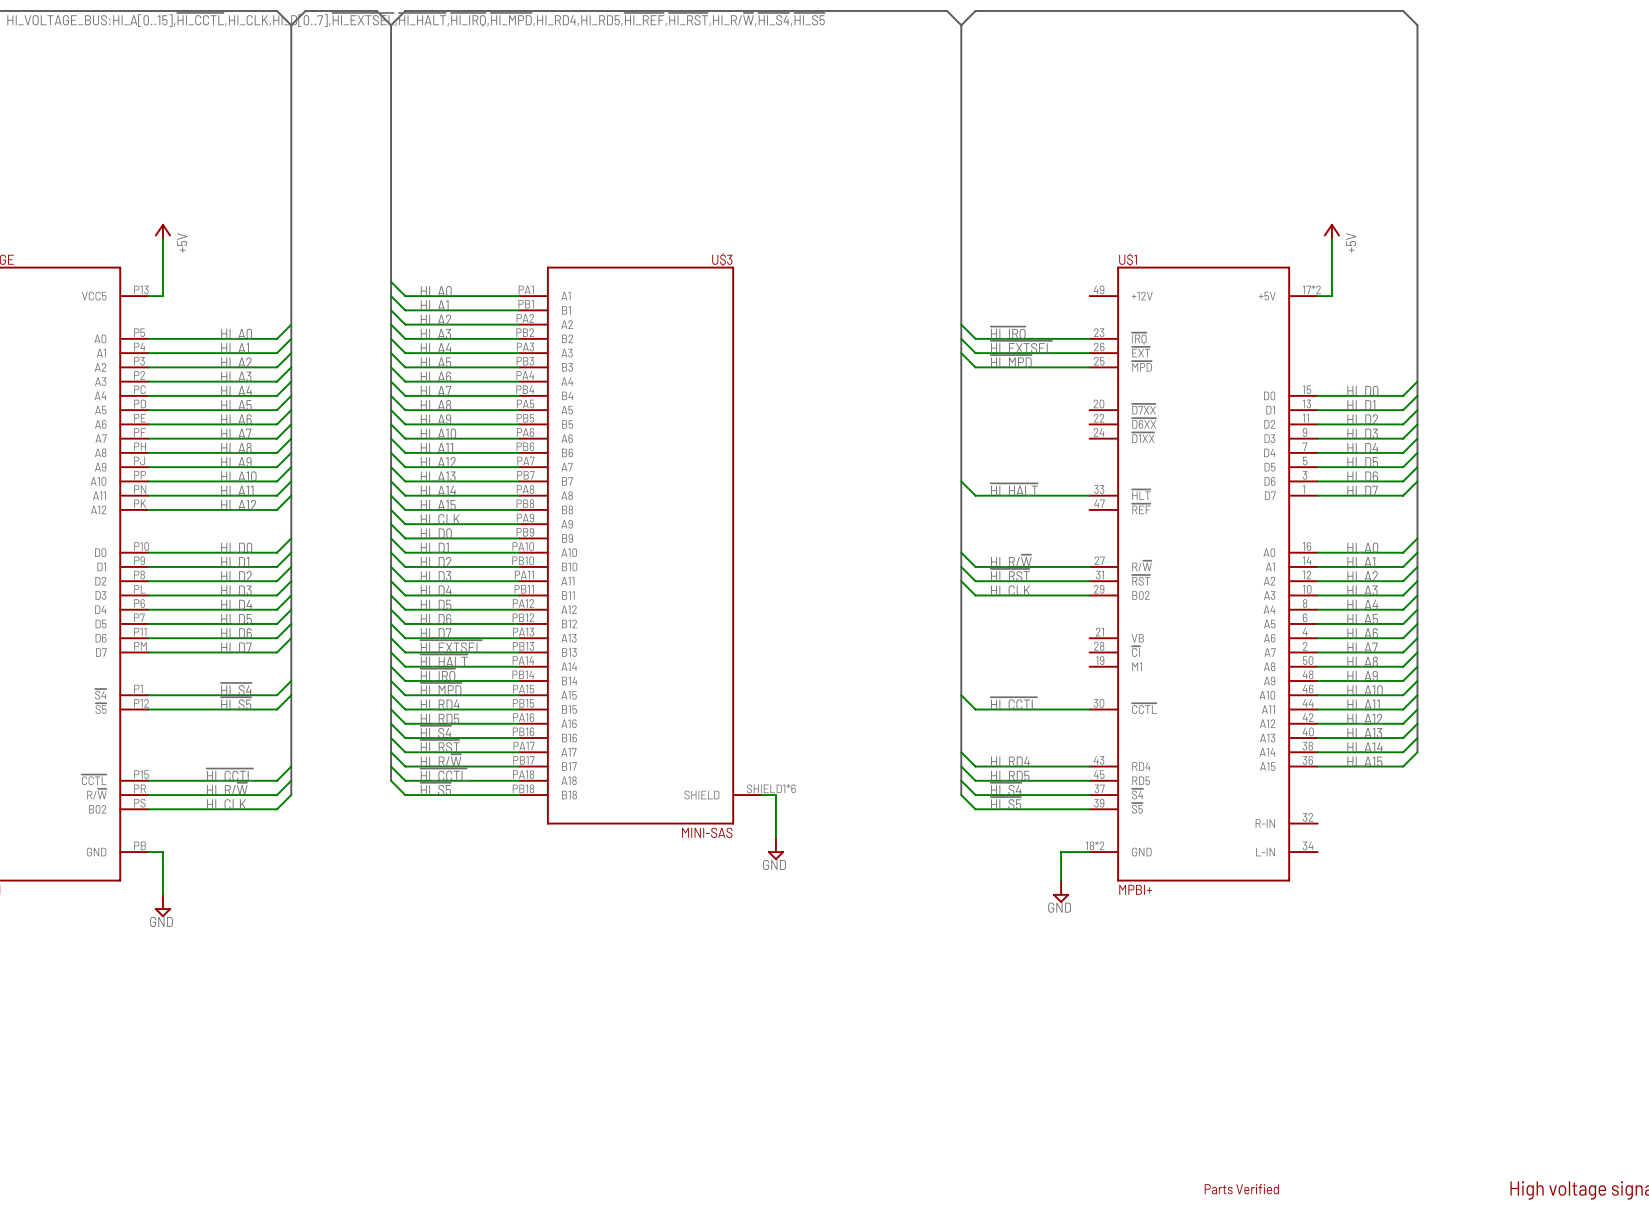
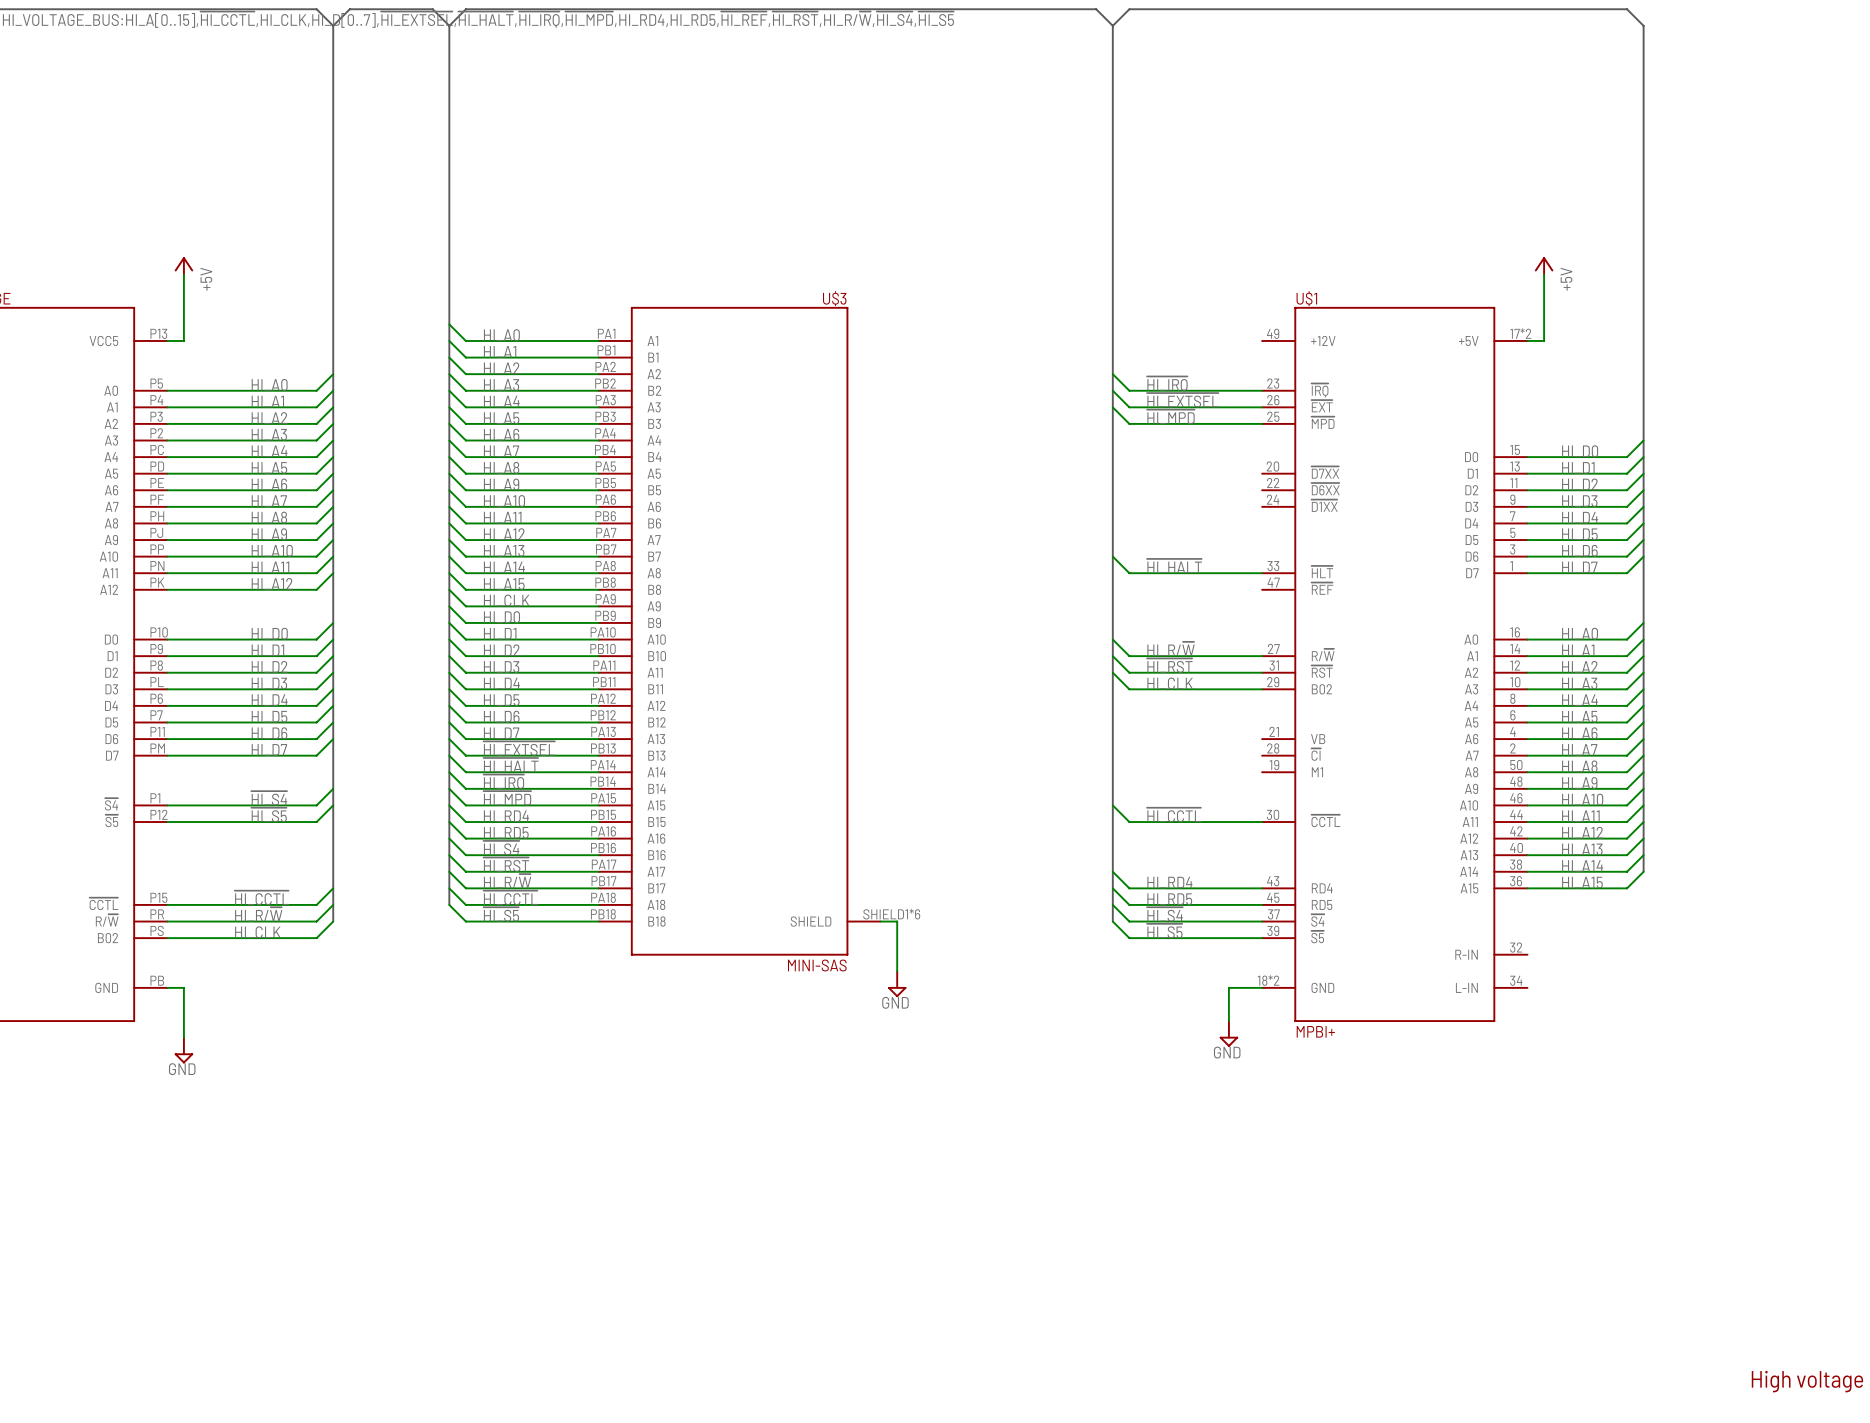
text: Parts Verified (1241, 1189) -> none

